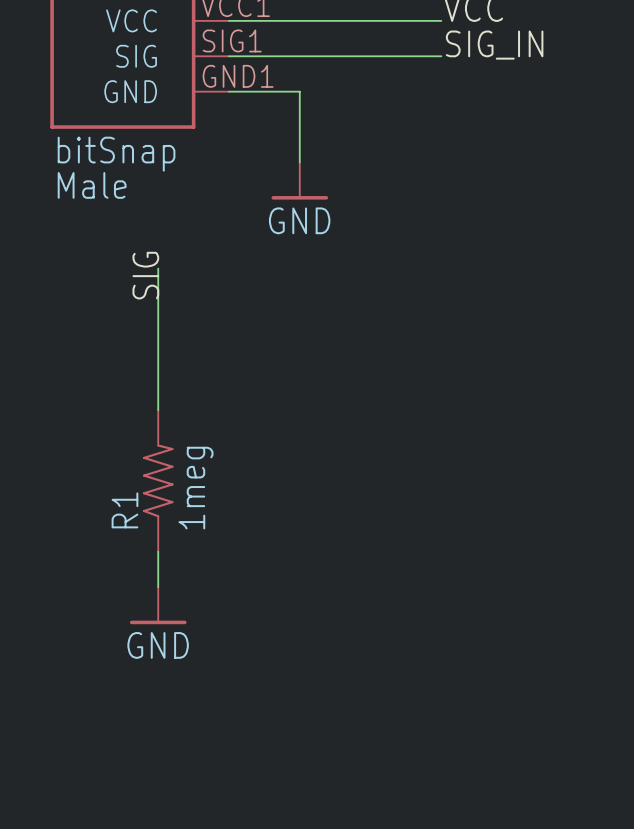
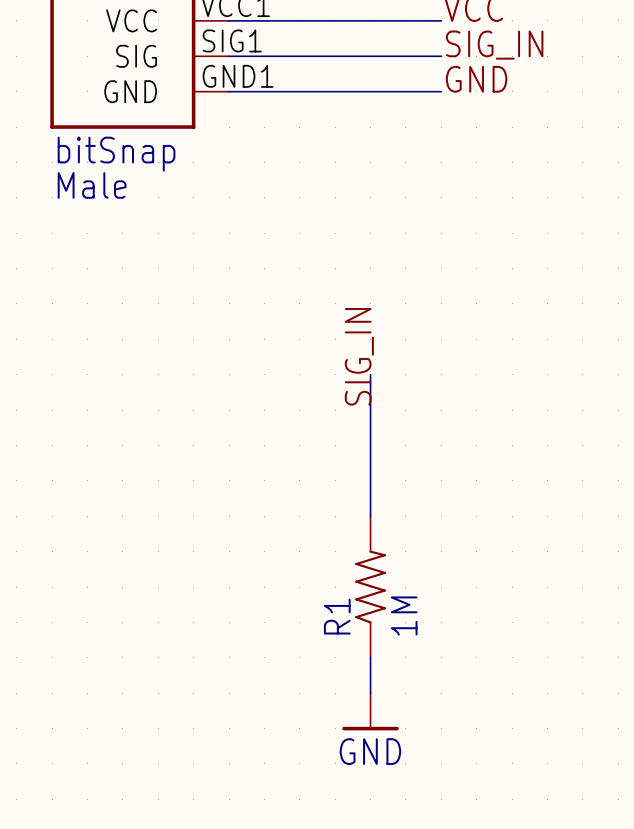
label: none -> GND (476, 79)
wire: (299, 91) (299, 162) -> (299, 91) (441, 91)
power symbol: GND (299, 181) -> none
wire: (158, 268) (158, 410) -> (370, 374) (370, 516)
label: SIG (145, 275) -> none
label: none -> SIG_IN (359, 356)
R1 position: (158, 480) -> (370, 587)
R1 value: 1meg (195, 488) -> 1M (404, 616)
wire: (158, 551) (158, 587) -> (370, 657) (370, 693)
power symbol position: GND (158, 605) -> GND (370, 711)

